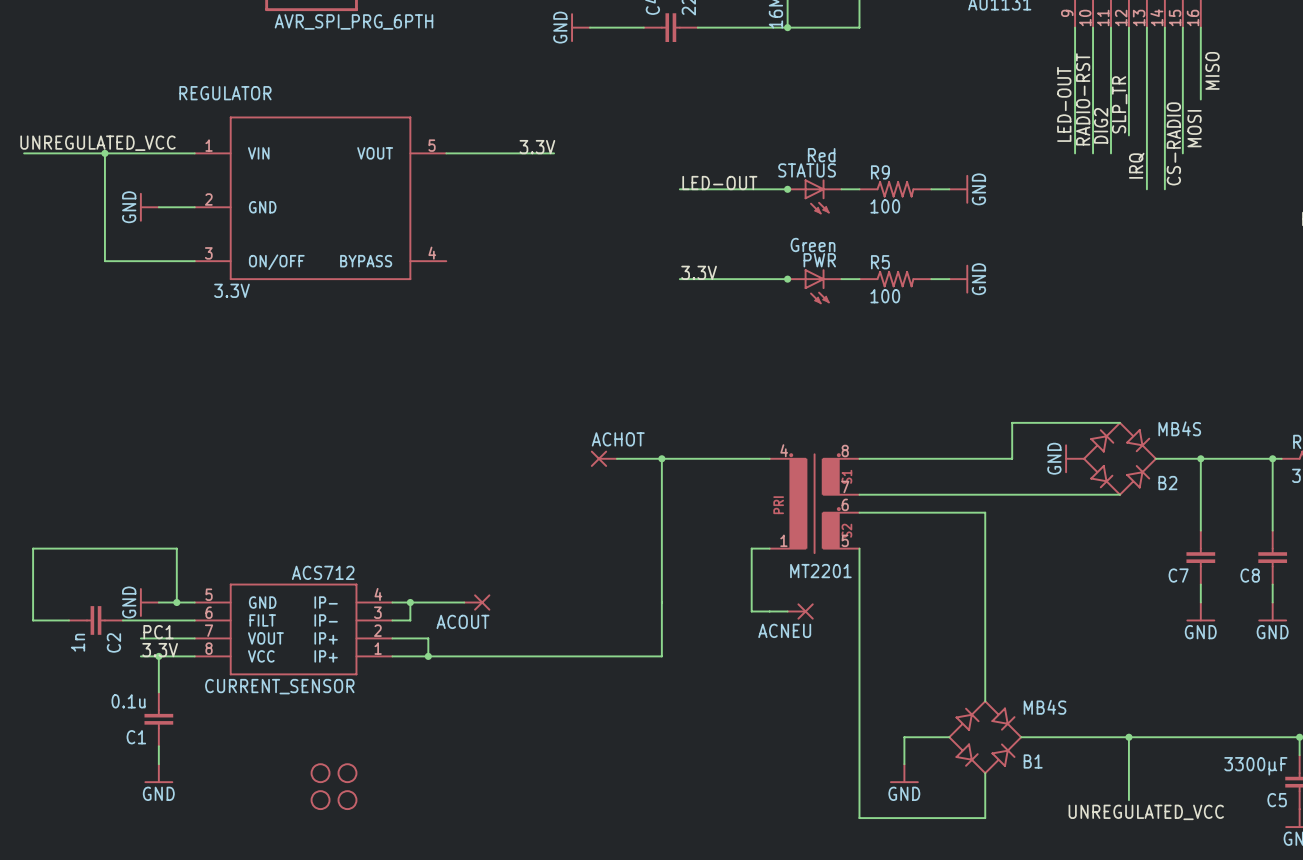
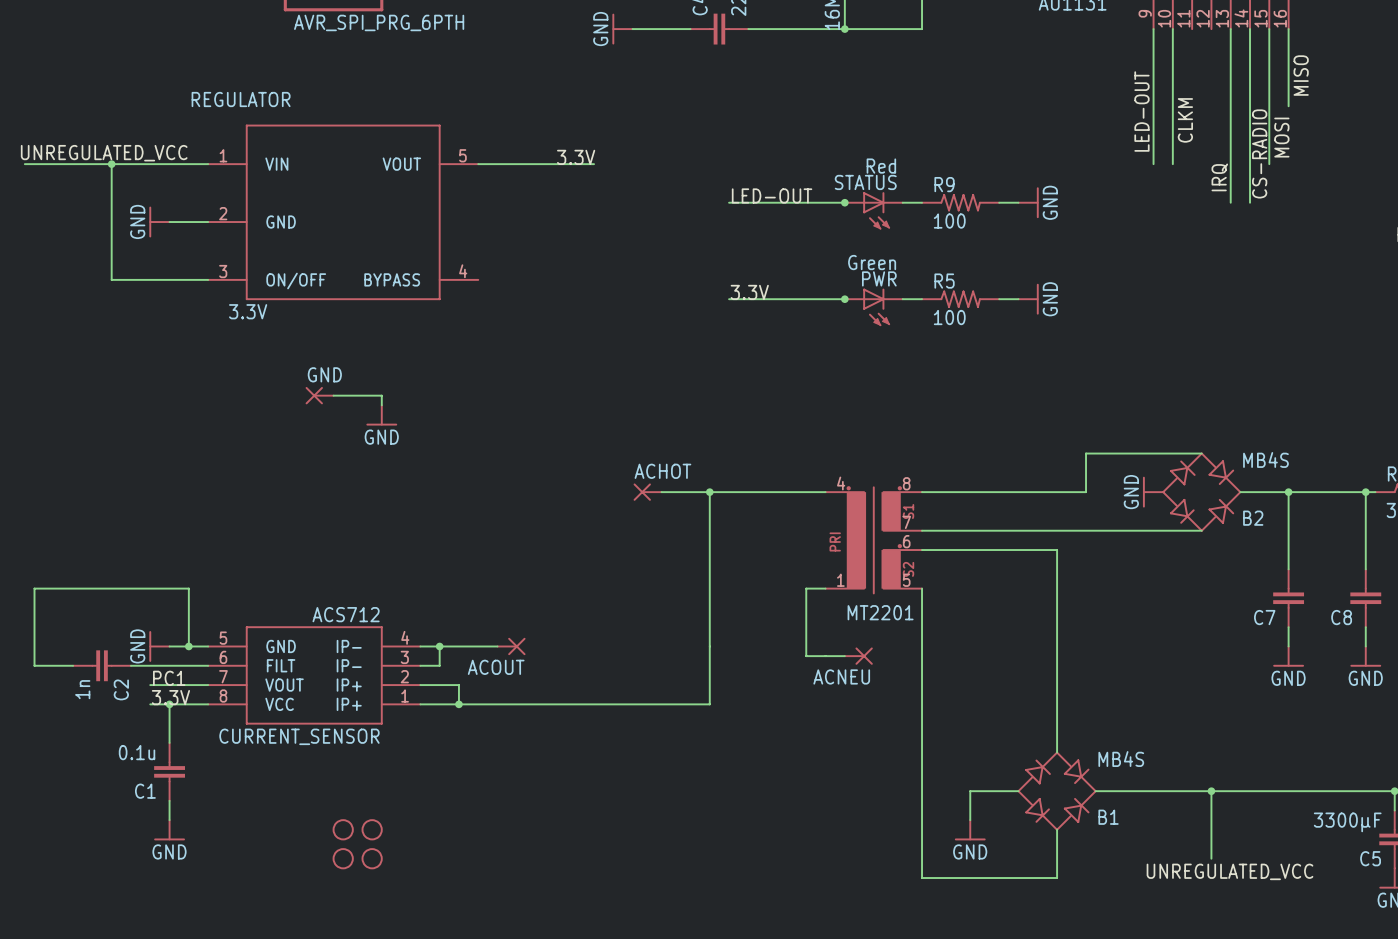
wire: (1110, 27) (1110, 153) -> none
wire: (1128, 27) (1128, 135) -> none
label: RADIO-RST (1083, 99) -> none
label: SLP_TR (1119, 104) -> none
label: none -> CLKM (1185, 120)
label: DIG2 (1101, 125) -> none
GND: none -> (319, 395)
wire: none -> (333, 395) (381, 395) (381, 405)
power symbol: none -> GND (381, 415)

